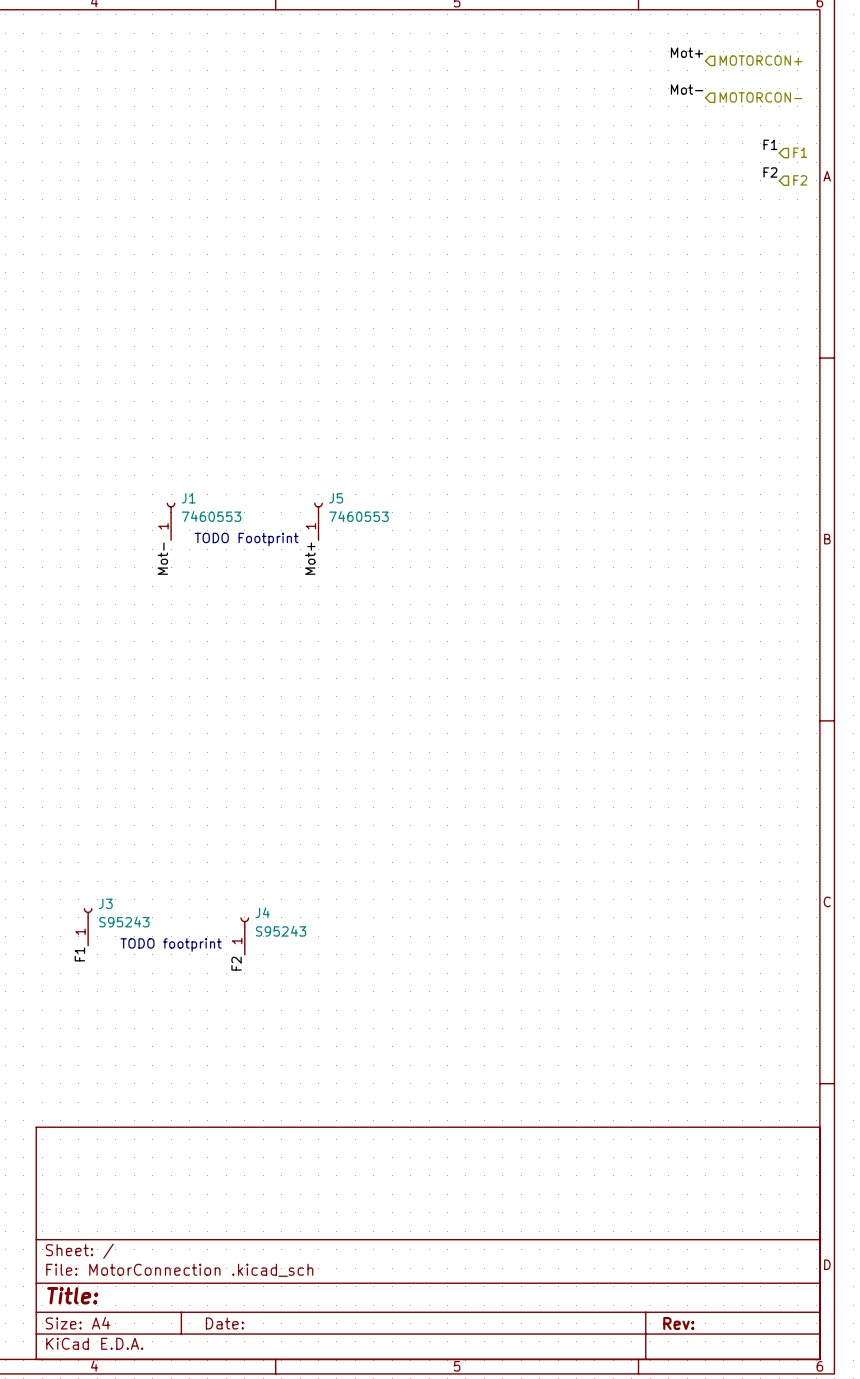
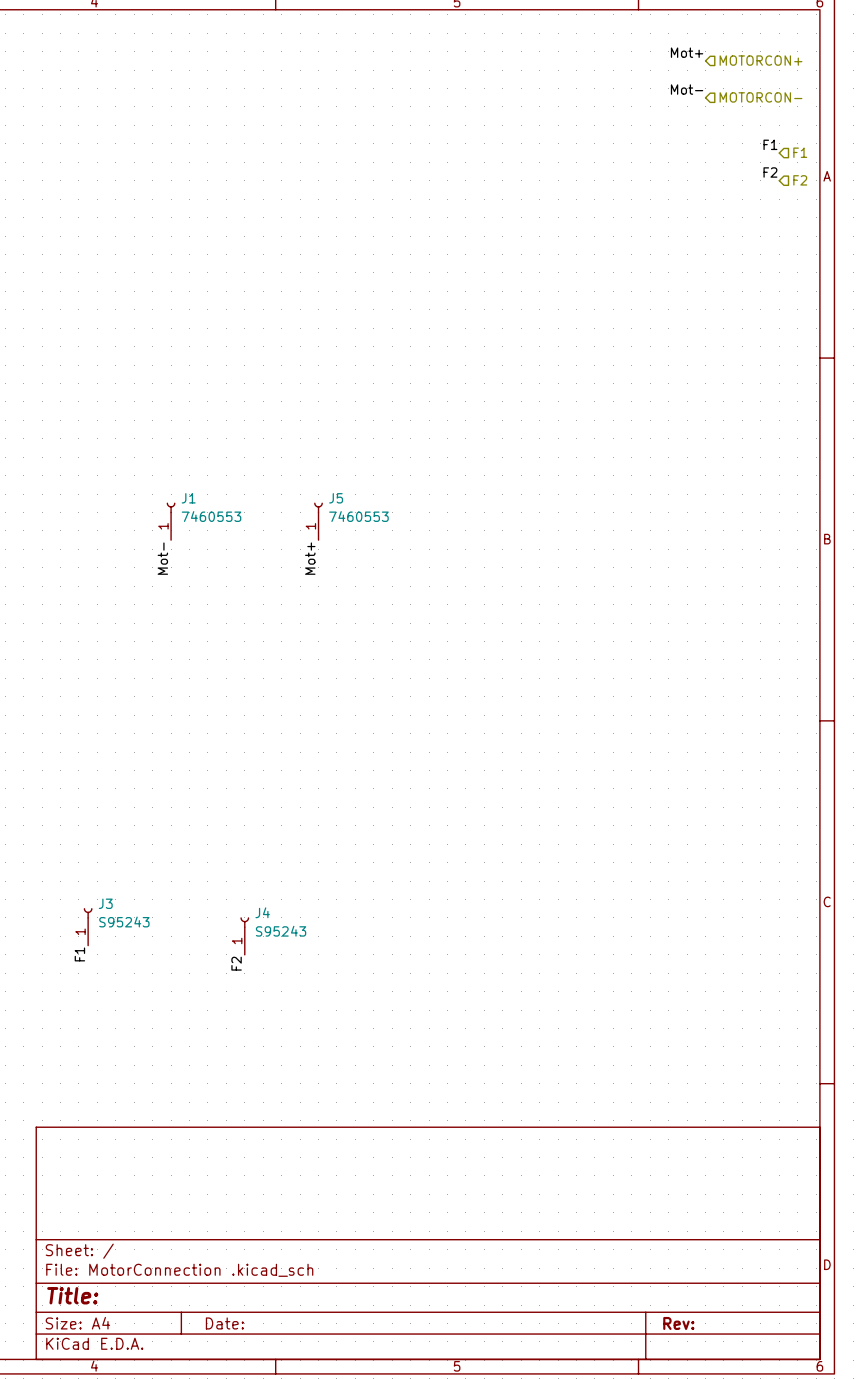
text: TODO Footprint (246, 539) -> none
text: TODO footprint (171, 944) -> none

